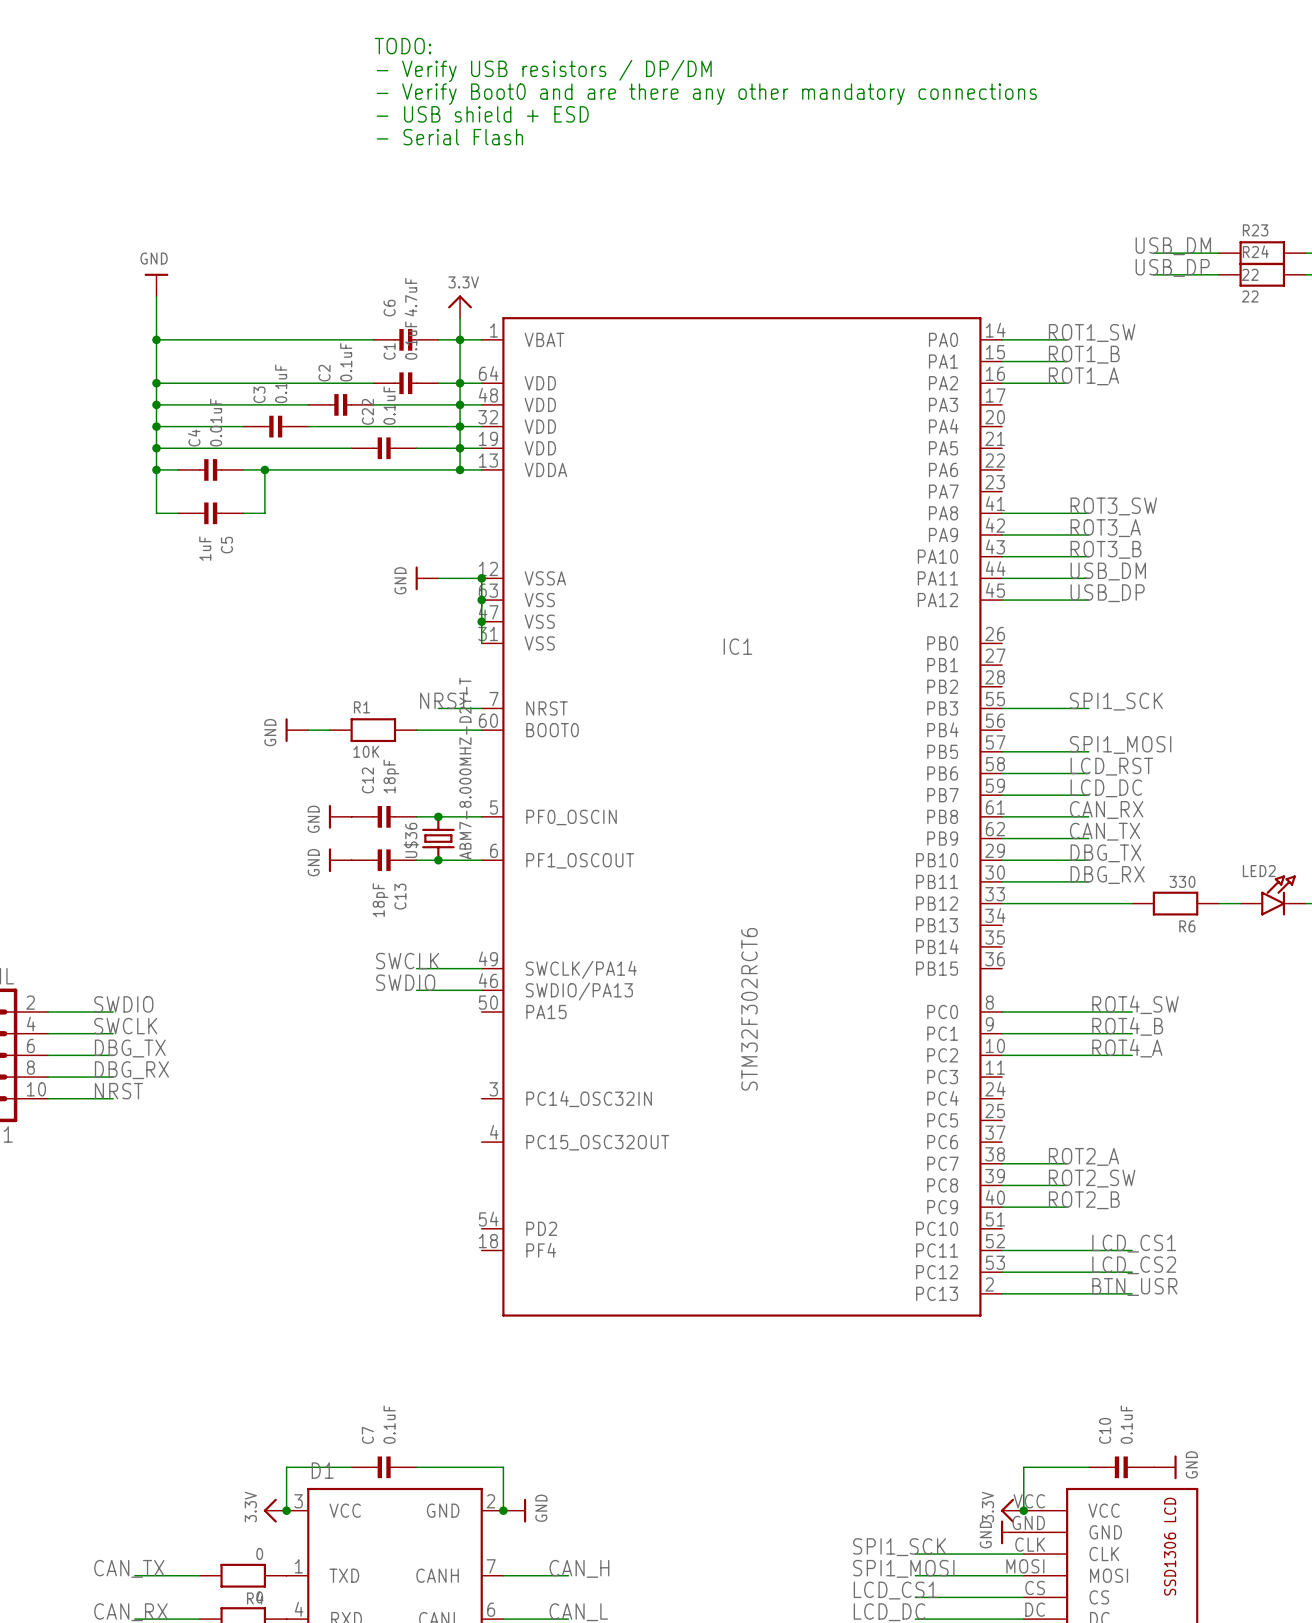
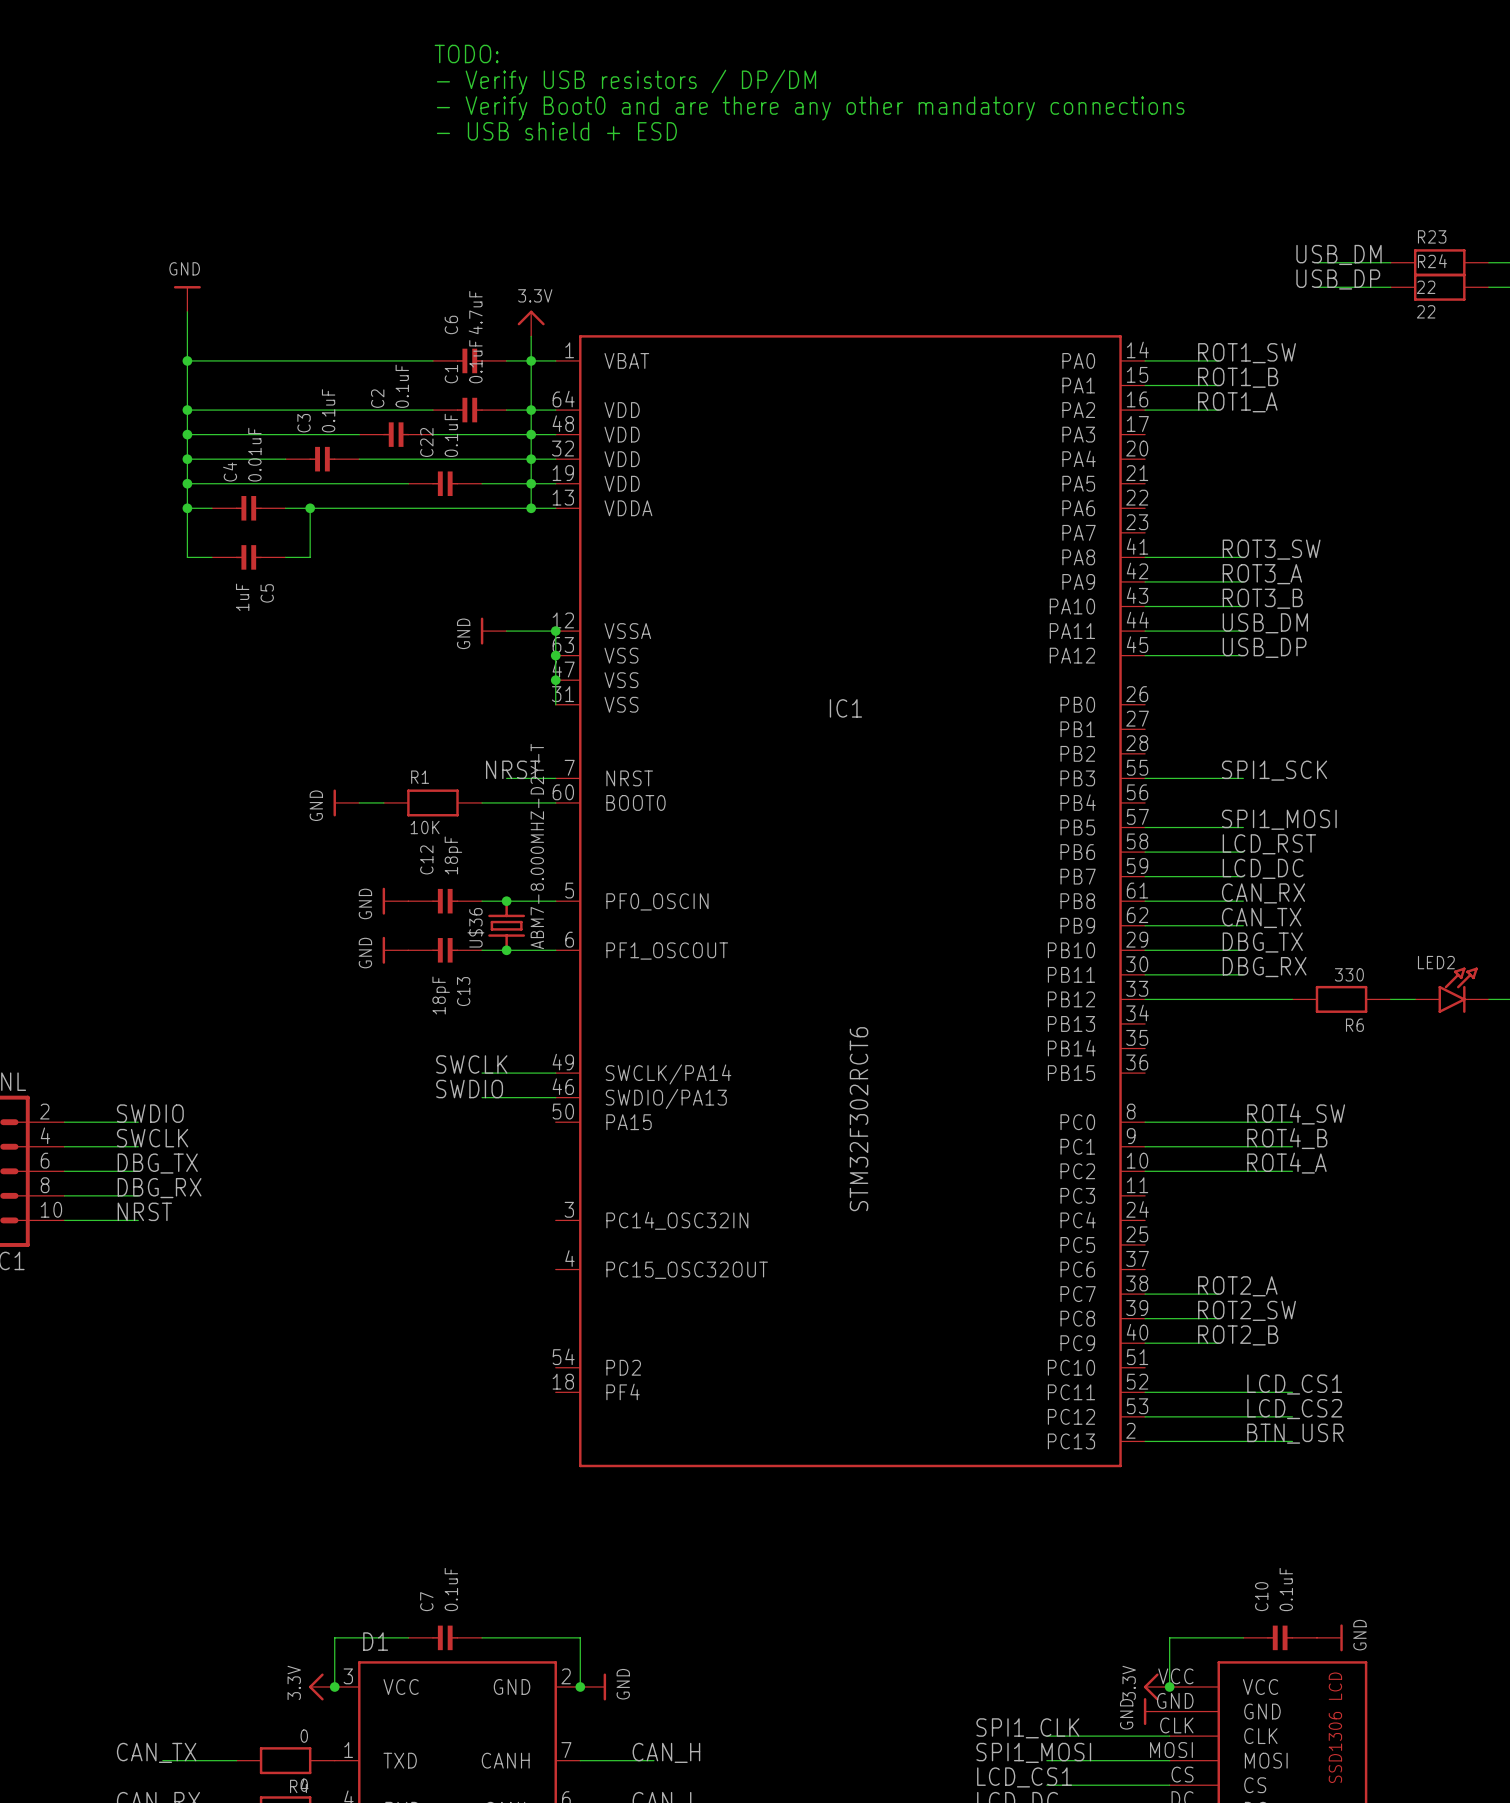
text: TODO: (403, 46) -> none
text: - Verify USB resistors / DP/DM (544, 71) -> TODO: (466, 53)
text: - Verify Boot0 and are there any other mandatory connections (706, 94) -> - Verify USB resistors / DP/DM (626, 82)
text: - USB shield + ESD (482, 114) -> - Verify Boot0 and are there any other mandatory connections (810, 108)
text: - Serial Flash (449, 137) -> - USB shield + ESD (556, 131)
label: SPI1_SCK (899, 1547) -> SPI1_CLK (1027, 1728)

